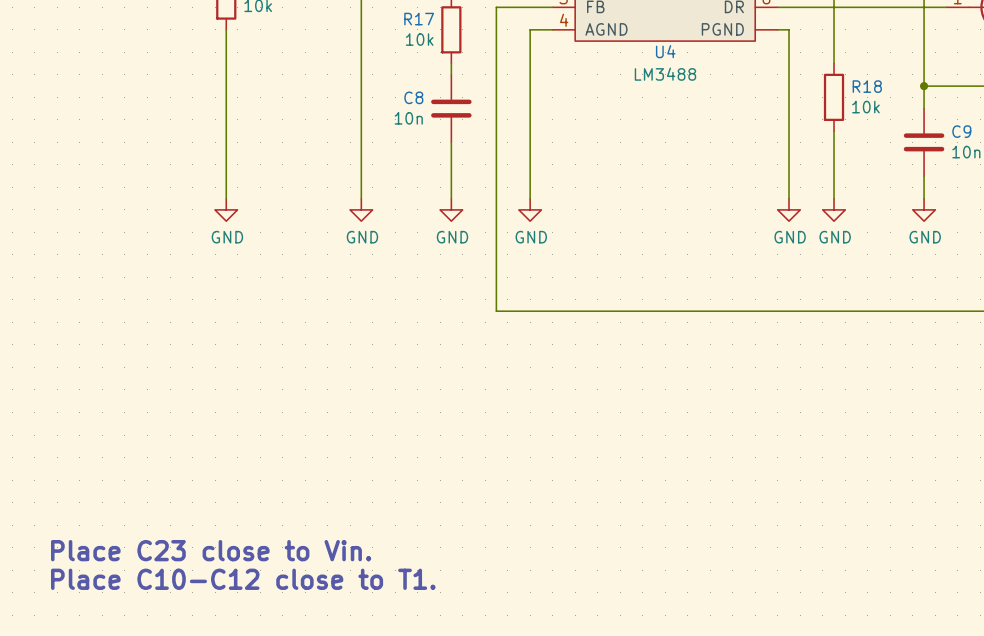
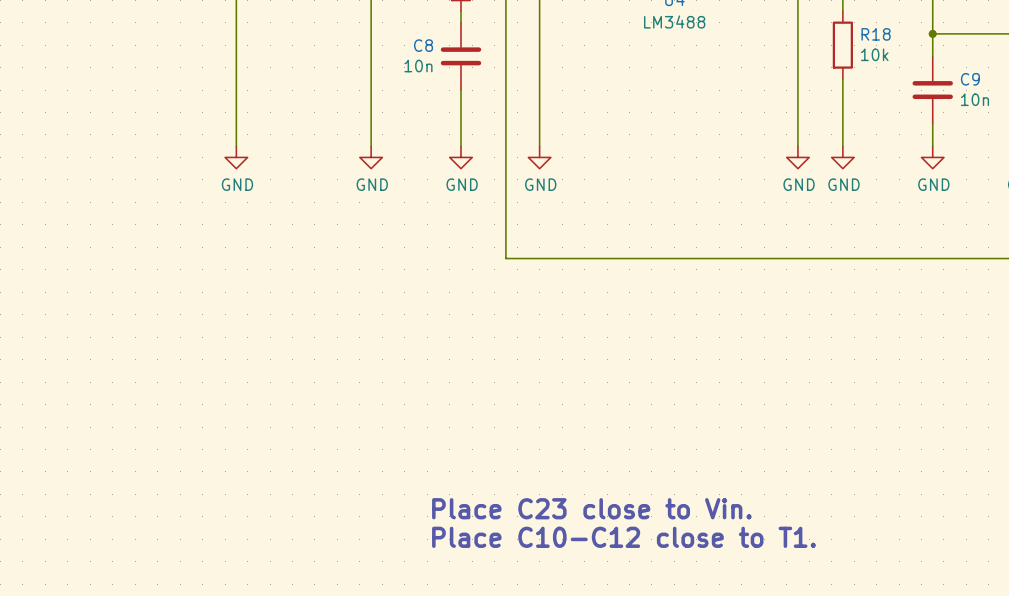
text: Place C23 close to Vin. (211, 550) -> none
text: none -> Place C23 close to Vin. (591, 508)
text: Place C10-C12 close to T1. (243, 579) -> none
text: none -> Place C10-C12 close to T1. (623, 537)

